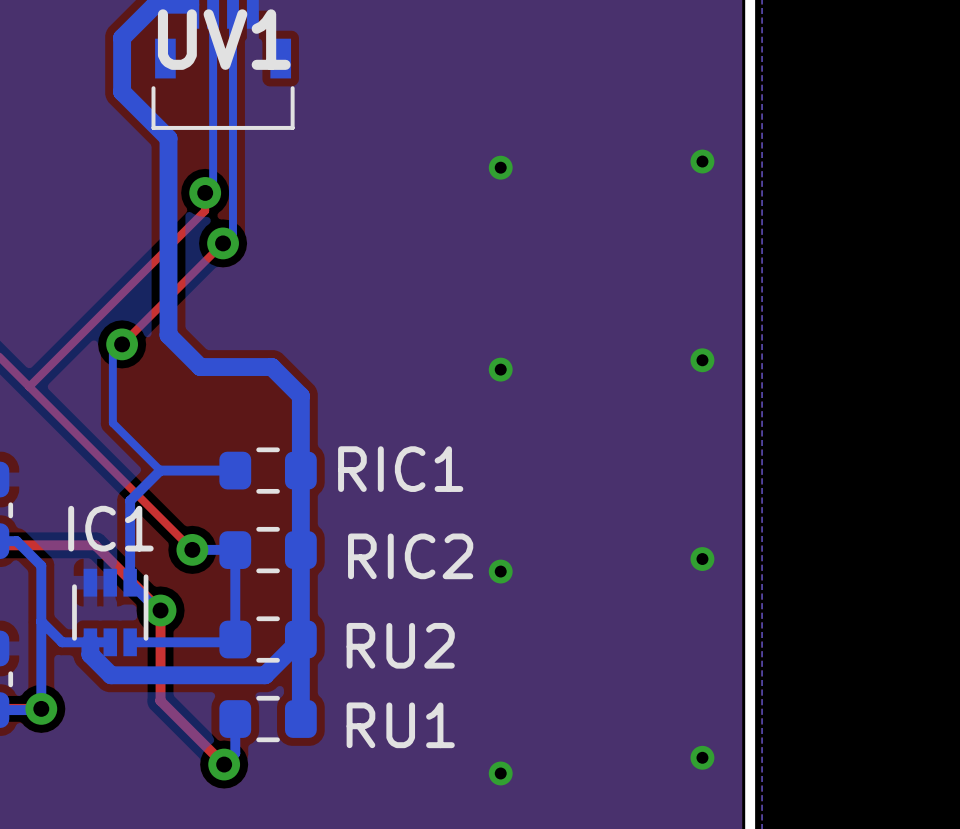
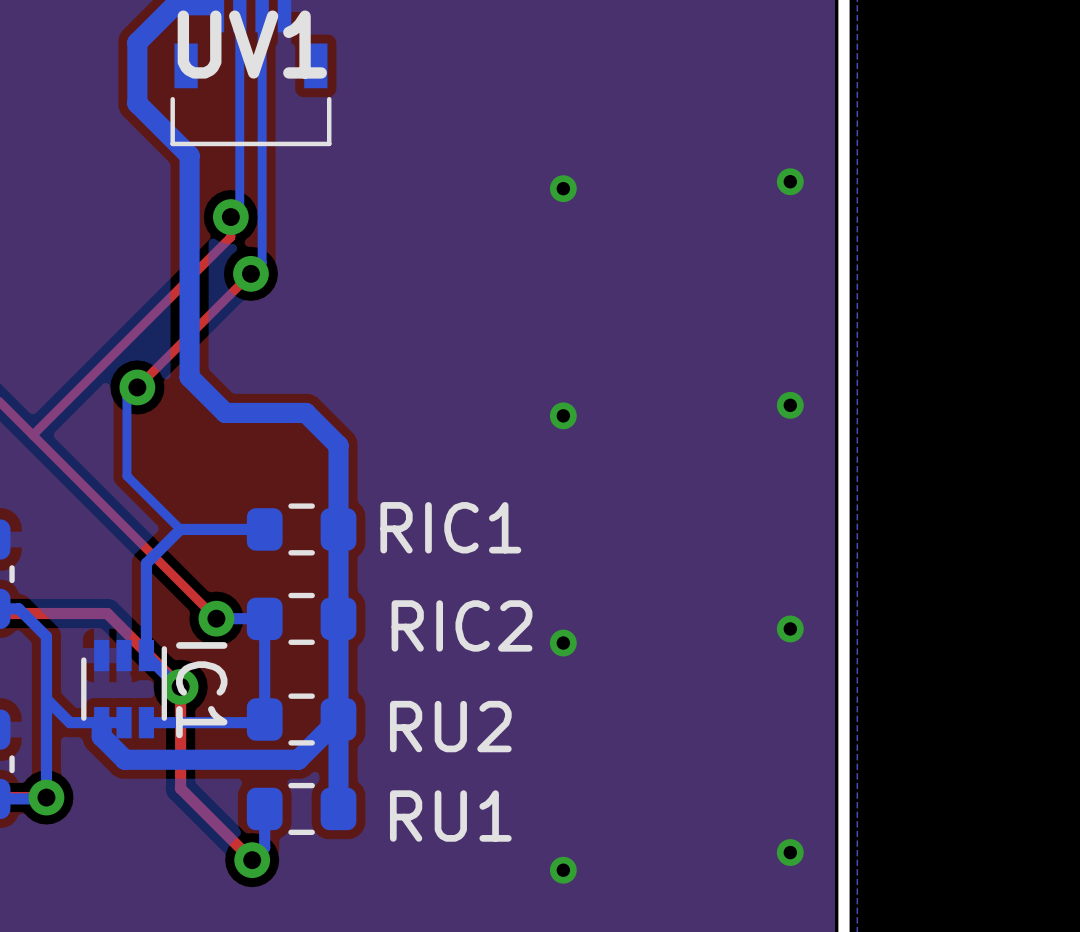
IC1 name rotation: 0° (110, 528) -> 90° clockwise (201, 690)

